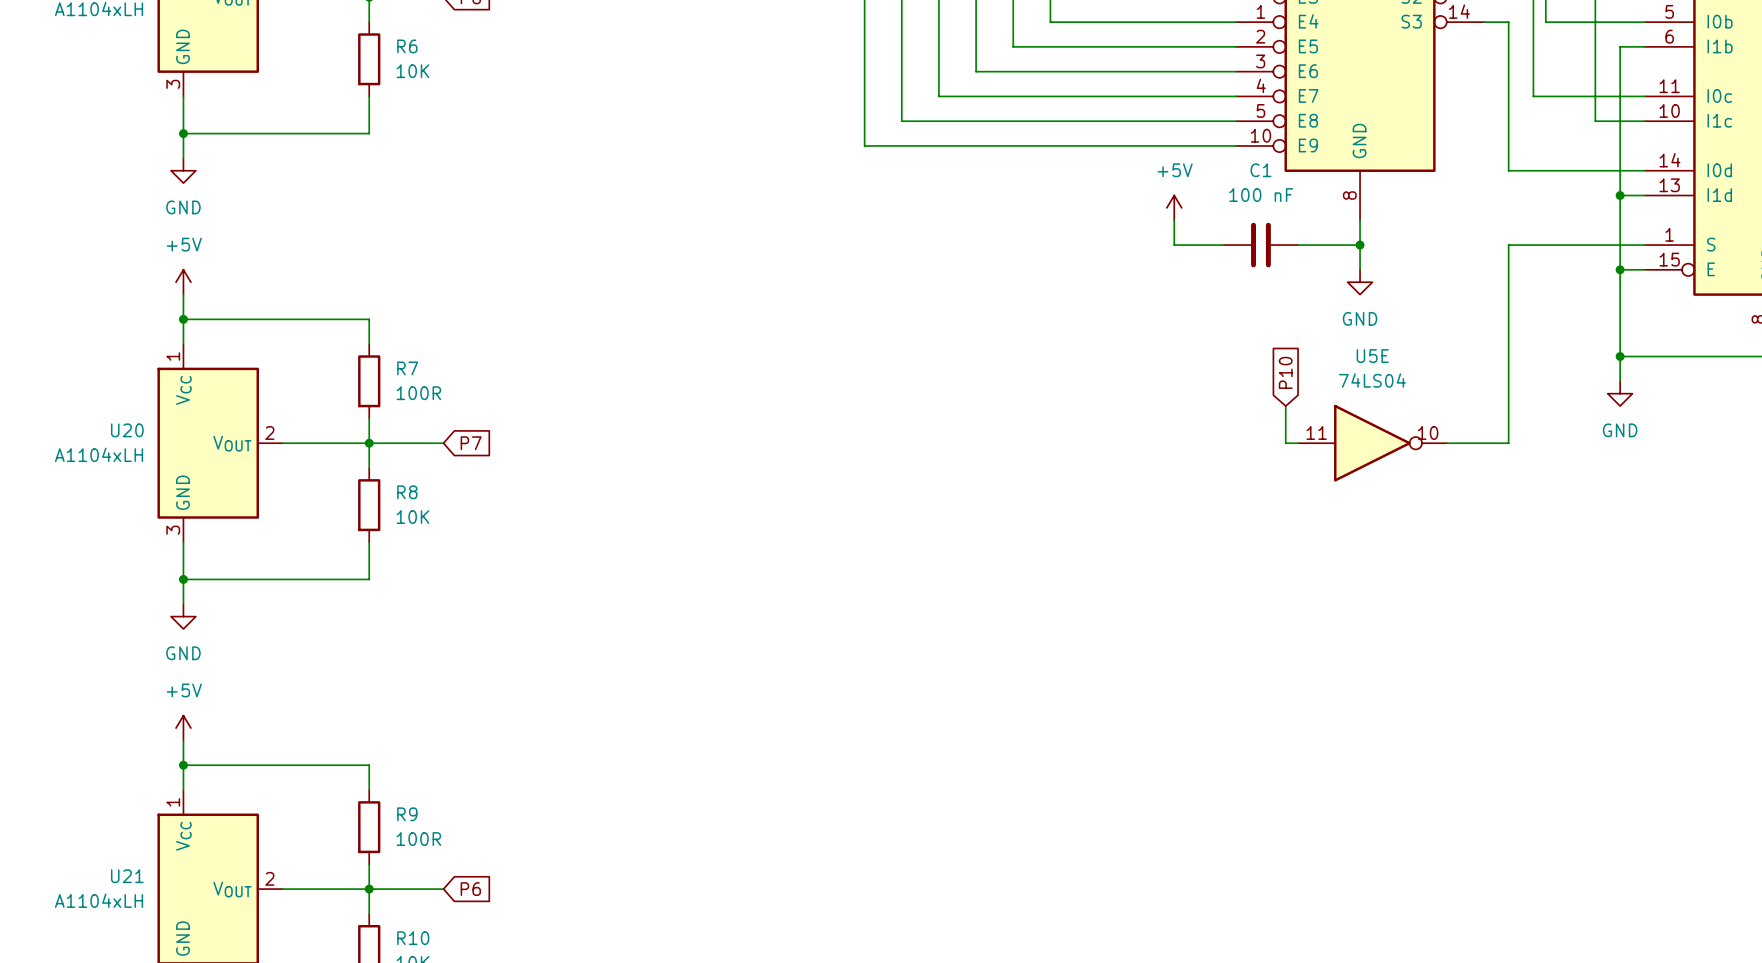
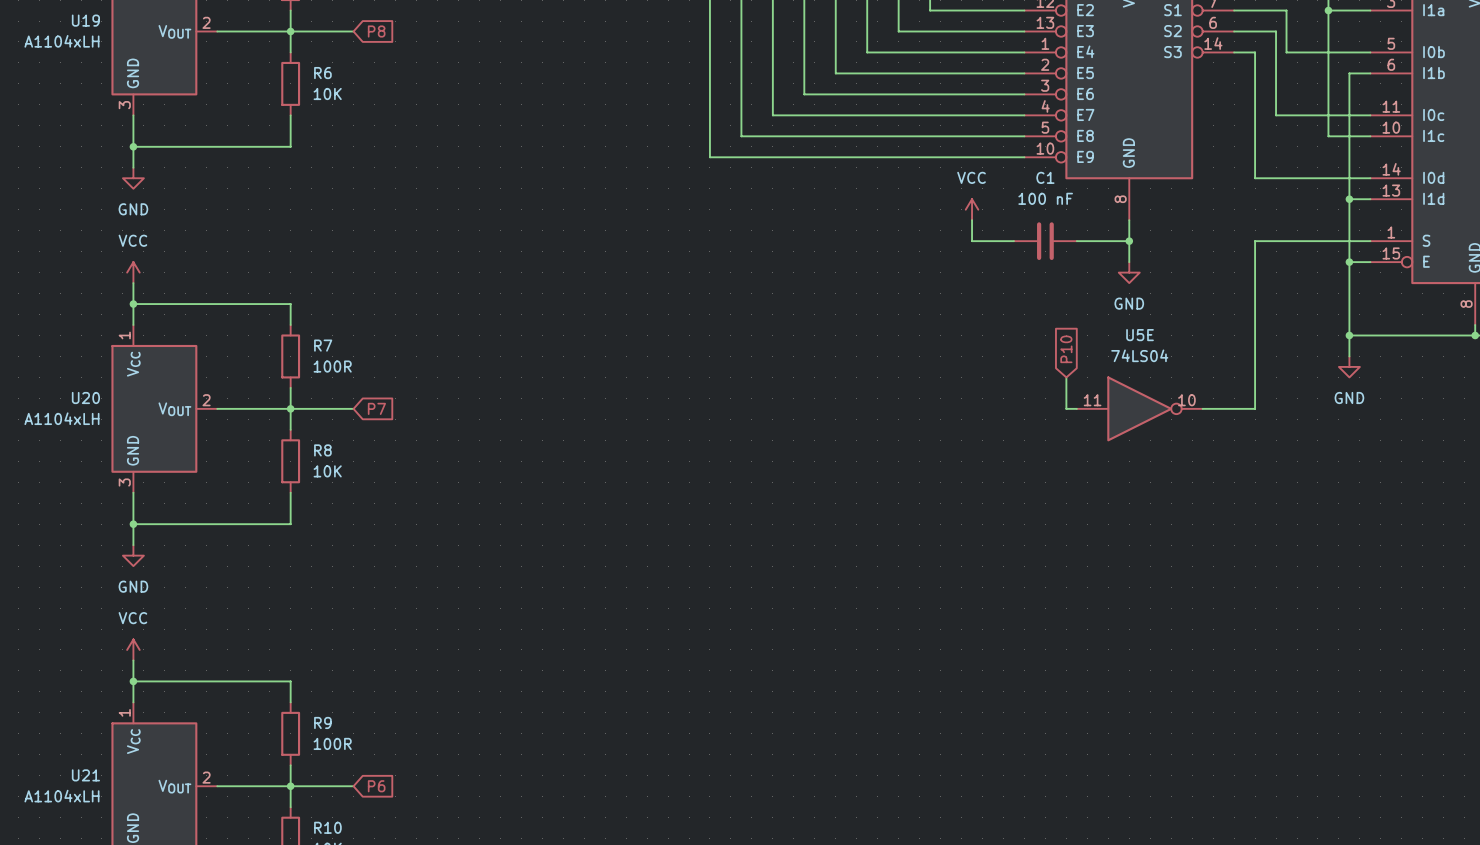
power symbol: +5V (1174, 207) -> VCC (972, 209)
power symbol: +5V (183, 282) -> VCC (133, 272)
power symbol: +5V (183, 728) -> VCC (133, 649)

